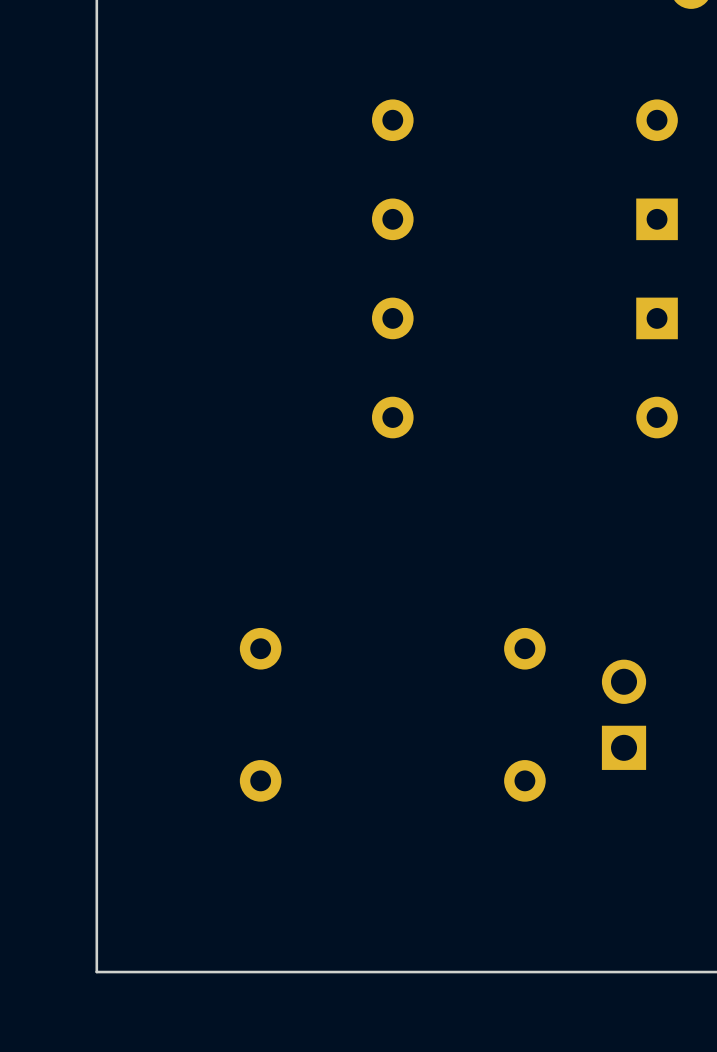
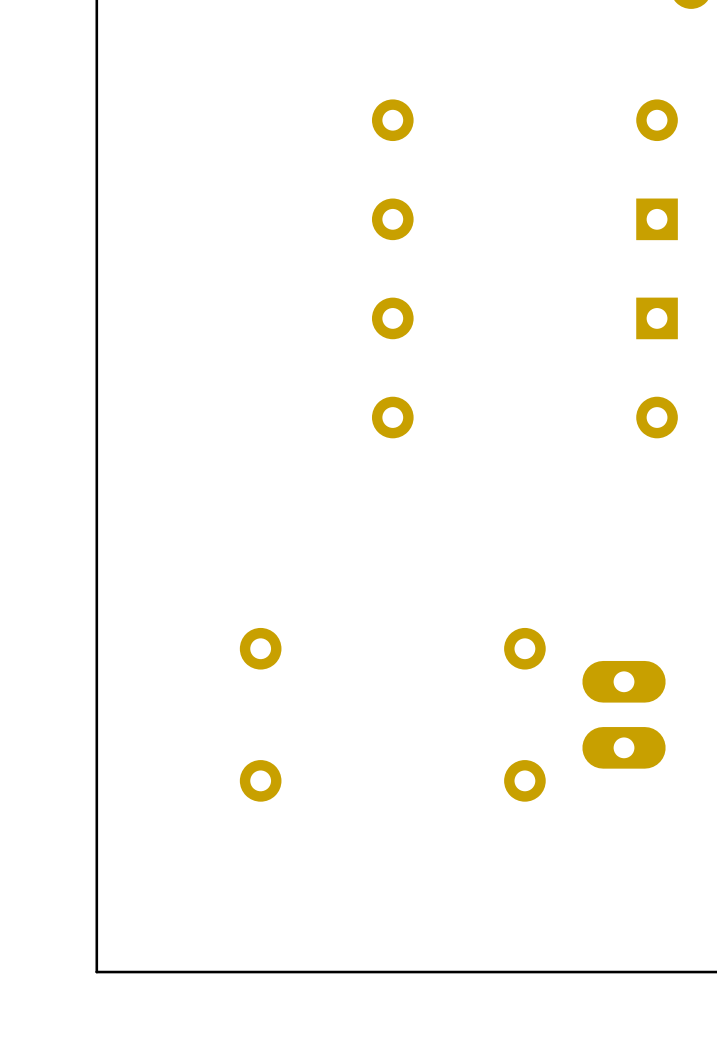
part footprint: [601, 659, 647, 770] -> [582, 660, 666, 769]

